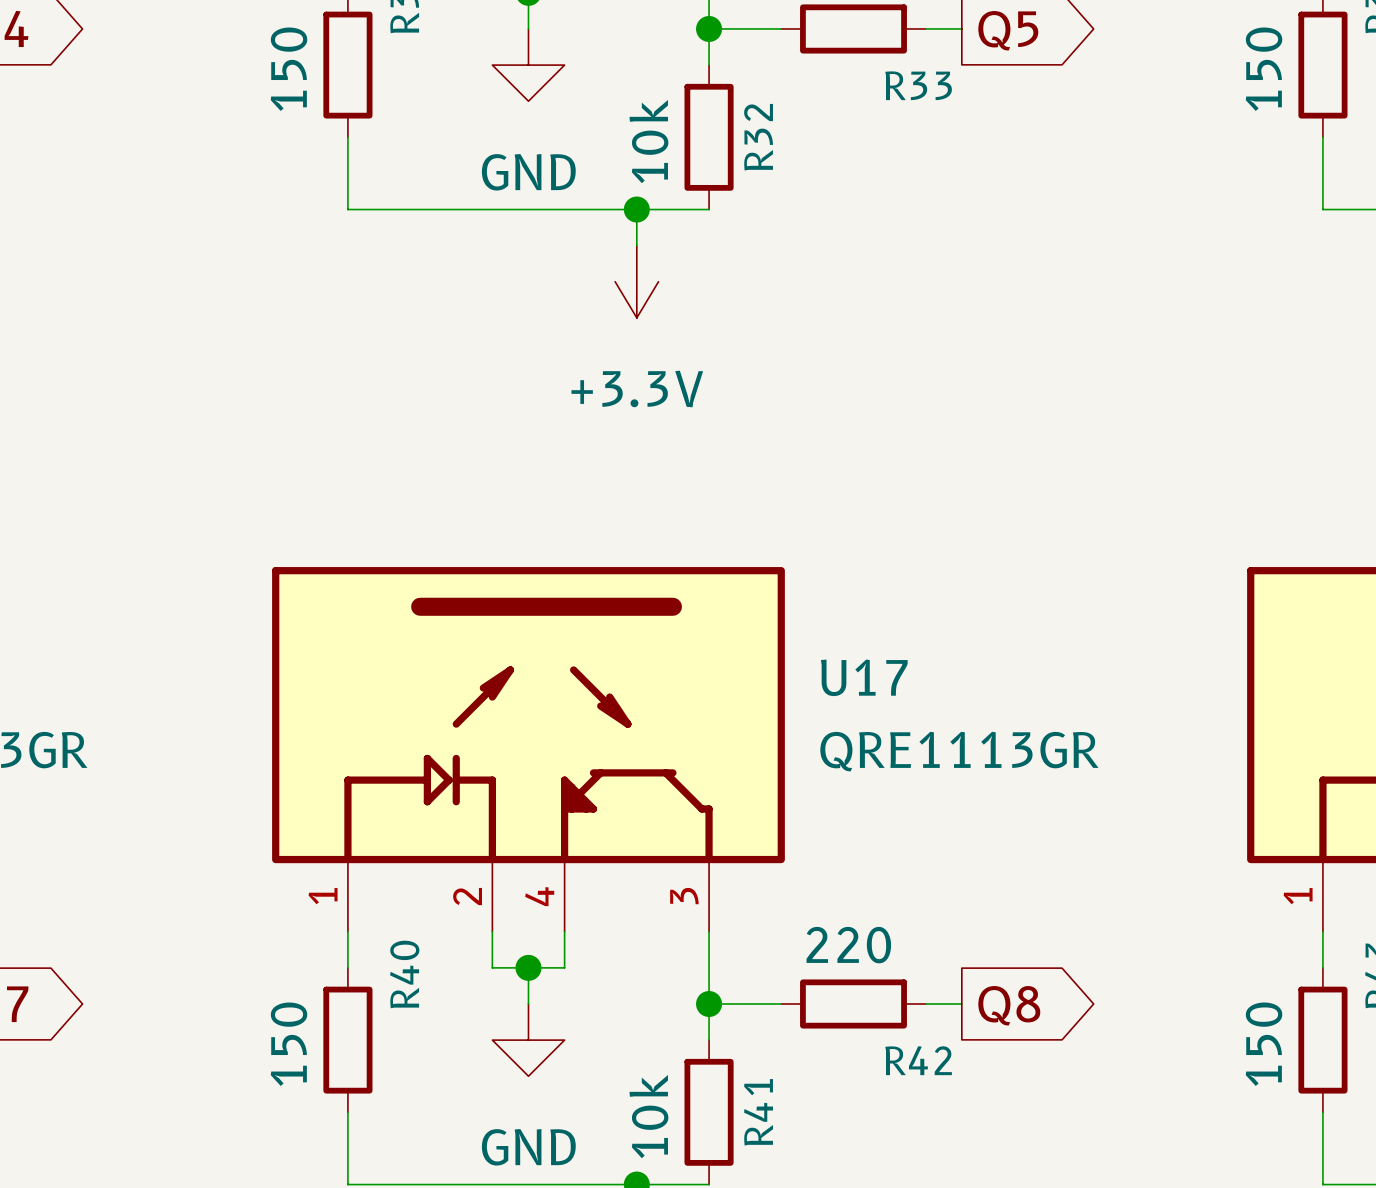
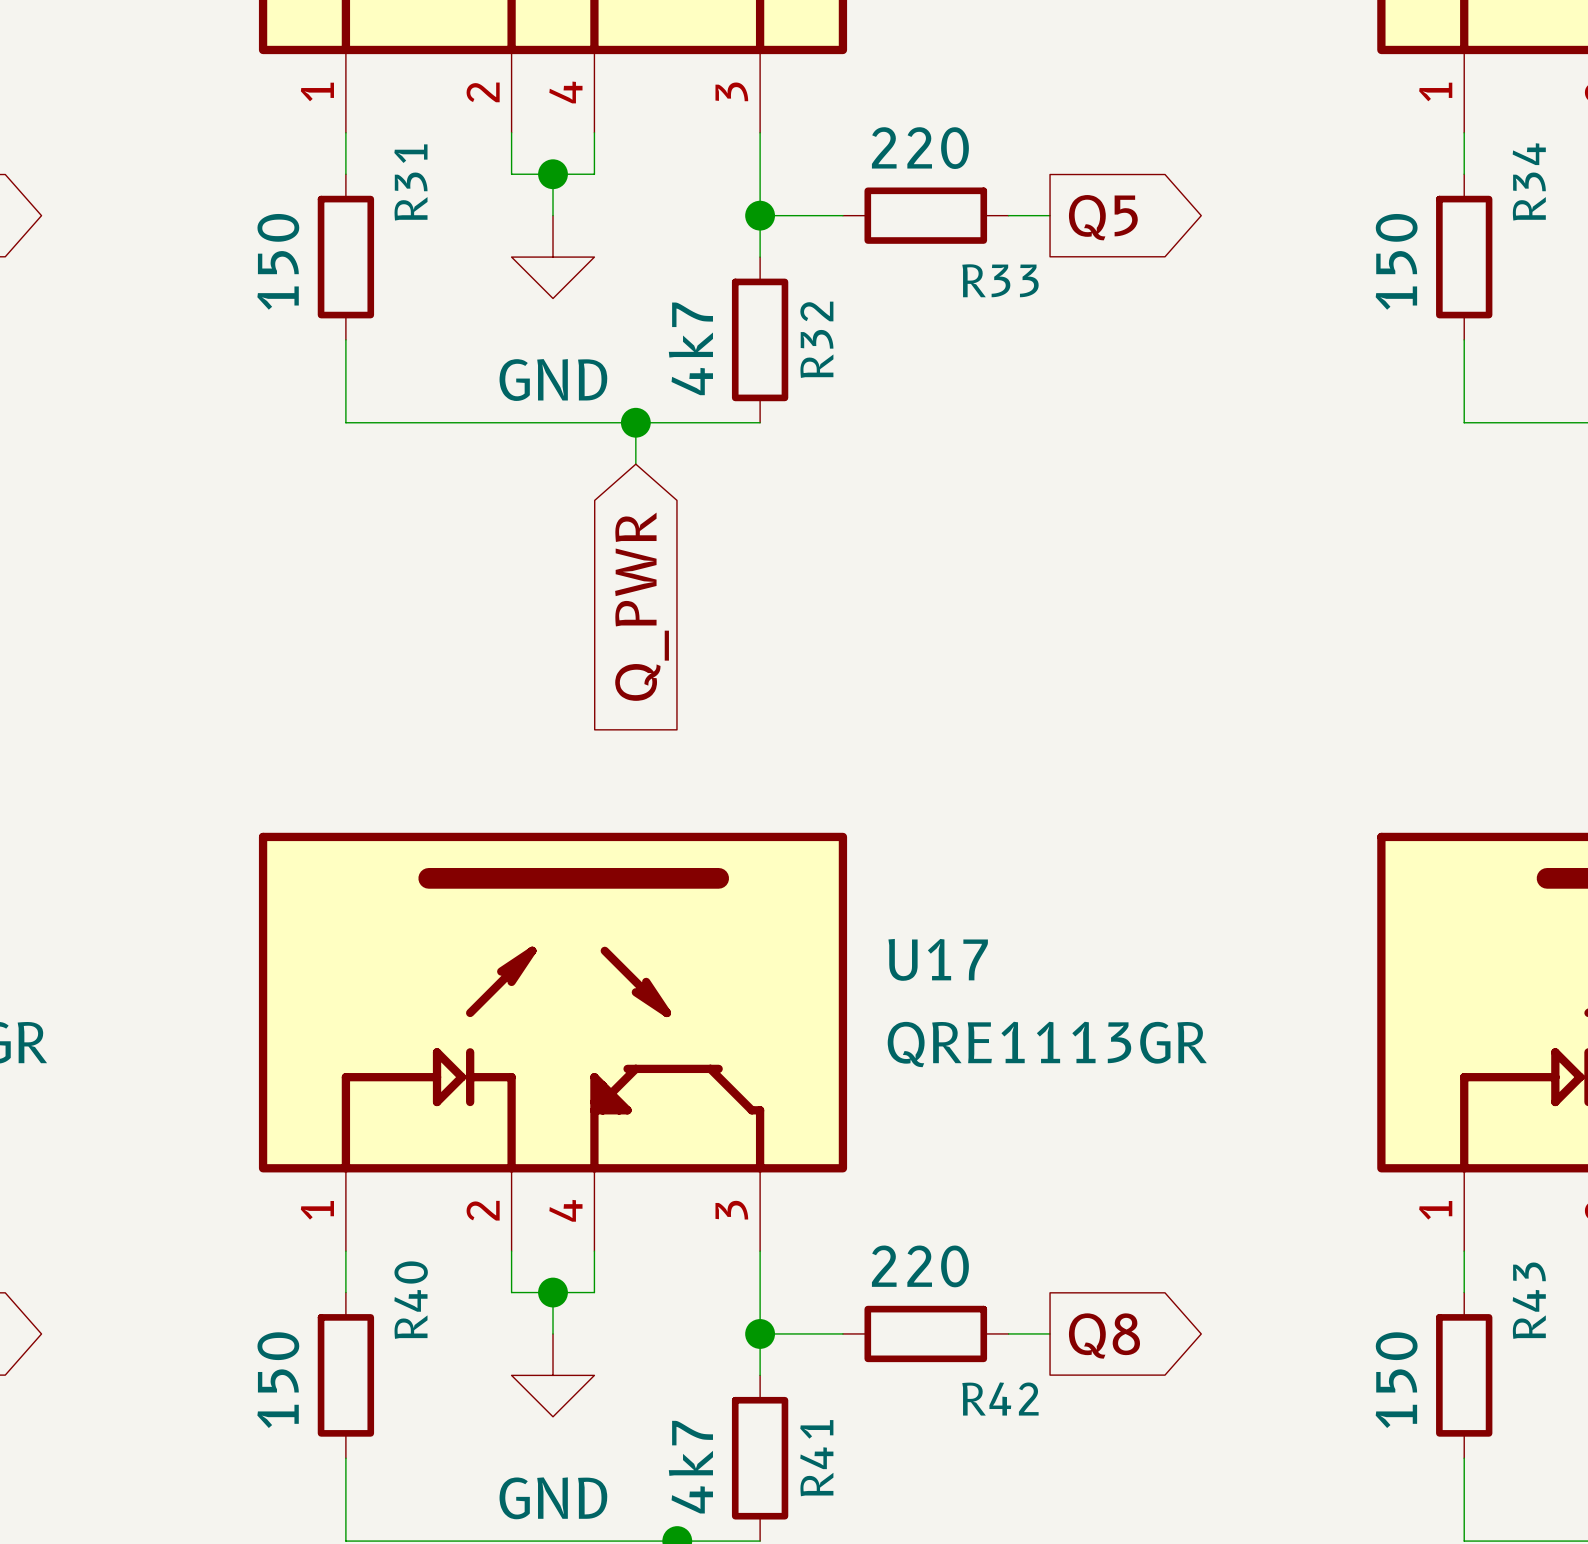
R32 value: 10k (648, 141) -> 4k7 (690, 348)
wire: (636, 209) (636, 245) -> (635, 422) (635, 464)
junction position: (636, 209) -> (635, 422)
power symbol: +3.3V (636, 281) -> none
global label: none -> Q_PWR (642, 606)
R41 value: 10k (648, 1116) -> 4k7 (690, 1467)

